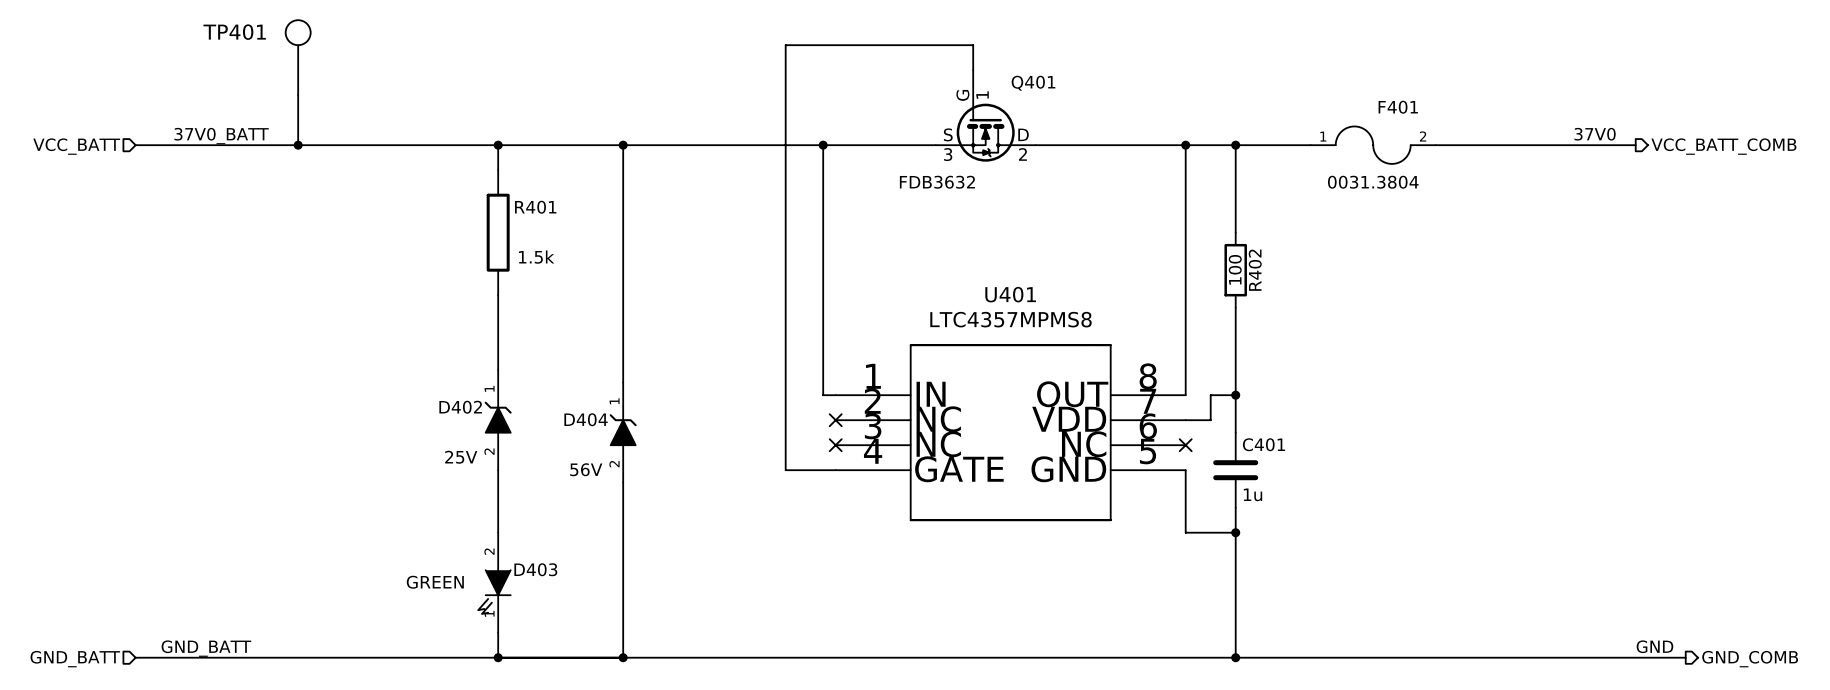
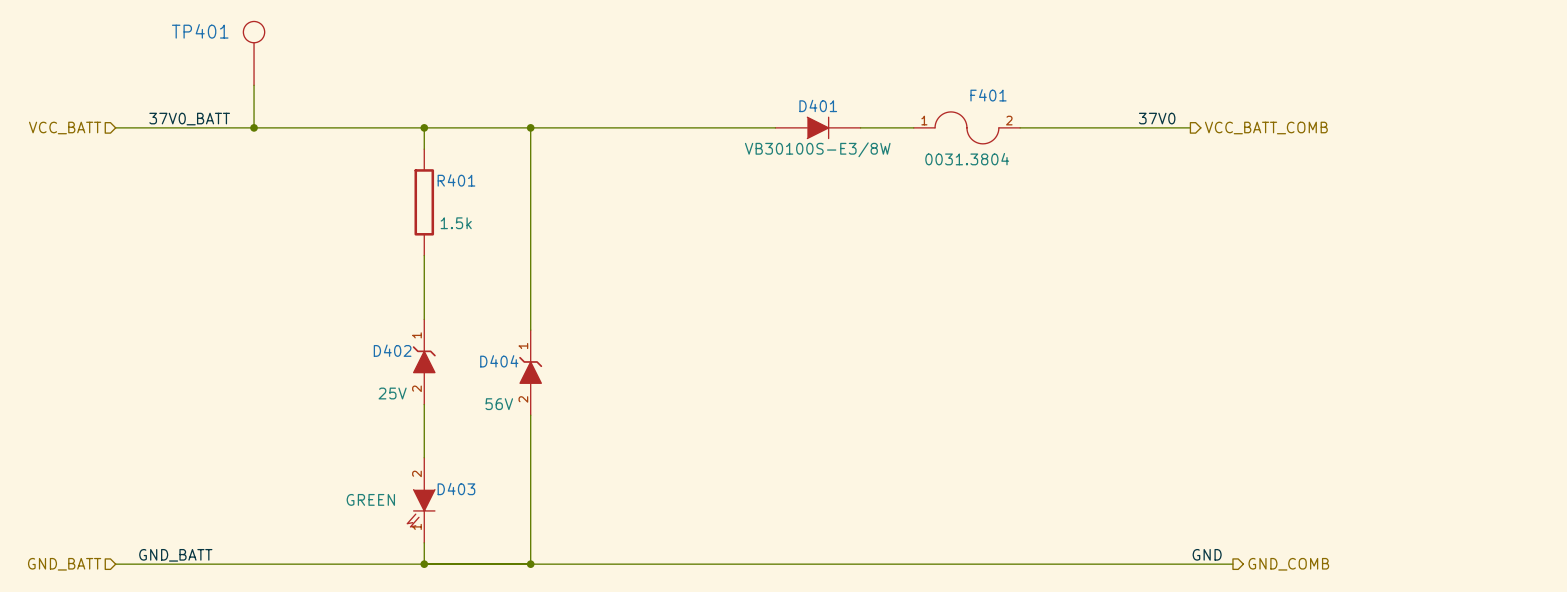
wire: (973, 70) (973, 45) (785, 45) (785, 470) (835, 470) -> none
Q401: FDB3632 (985, 115) -> none
label position: 37V0 (1595, 134) -> 37V0 (1157, 118)
wire: (823, 145) (823, 395) (835, 395) -> none
junction: (823, 145) -> none
D401: none -> VB30100S-E3/8W (817, 127)
wire: (1073, 145) (1198, 145) -> none
wire: (1185, 145) (1185, 395) -> none
junction: (1185, 145) -> none
wire: (1235, 145) (1235, 232) -> none
junction: (1235, 145) -> none
wire: none -> (1115, 127) (1190, 127)
F401 position: (1373, 145) -> (966, 127)
wire: (1435, 145) (1635, 145) -> none
hierarchical label position: VCC_BATT_COMB (1723, 146) -> VCC_BATT_COMB (1266, 127)
R402: 100 (1235, 270) -> none
wire: (1235, 307) (1235, 432) -> none
wire: (1235, 395) (1210, 395) (1210, 420) (1185, 420) -> none
junction: (1235, 395) -> none
no-connect mark: (835, 420) -> none
U401: LTC4357MPMS8 (1010, 432) -> none
no-connect mark: (835, 445) -> none
no-connect mark: (1185, 445) -> none
wire: (1185, 470) (1185, 532) (1235, 532) -> none
C401: 1u (1235, 470) -> none
wire: (1235, 507) (1235, 657) -> none
junction: (1235, 532) -> none
label position: GND (1654, 646) -> GND (1207, 554)
junction: (1235, 657) -> none
wire: (1448, 657) (1685, 657) -> none
hierarchical label position: GND_COMB (1750, 659) -> GND_COMB (1288, 564)

